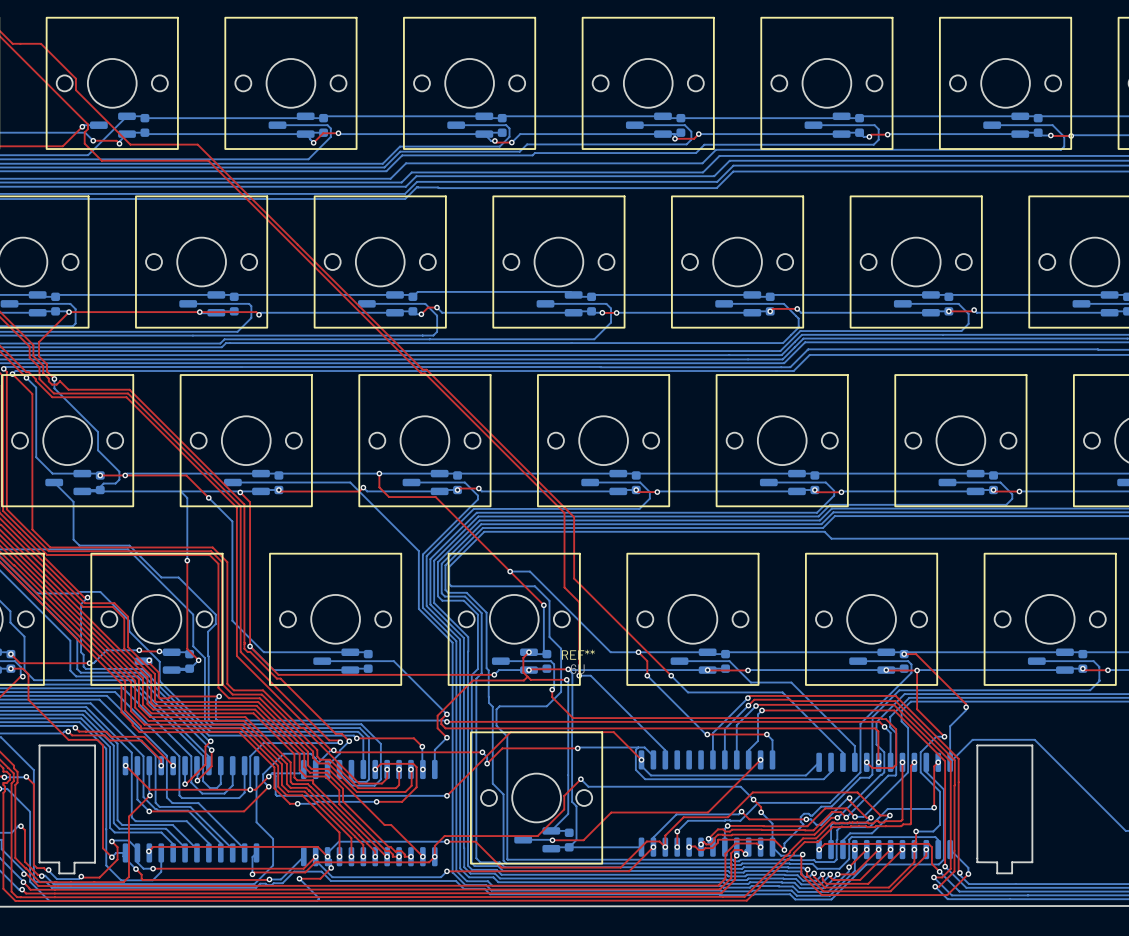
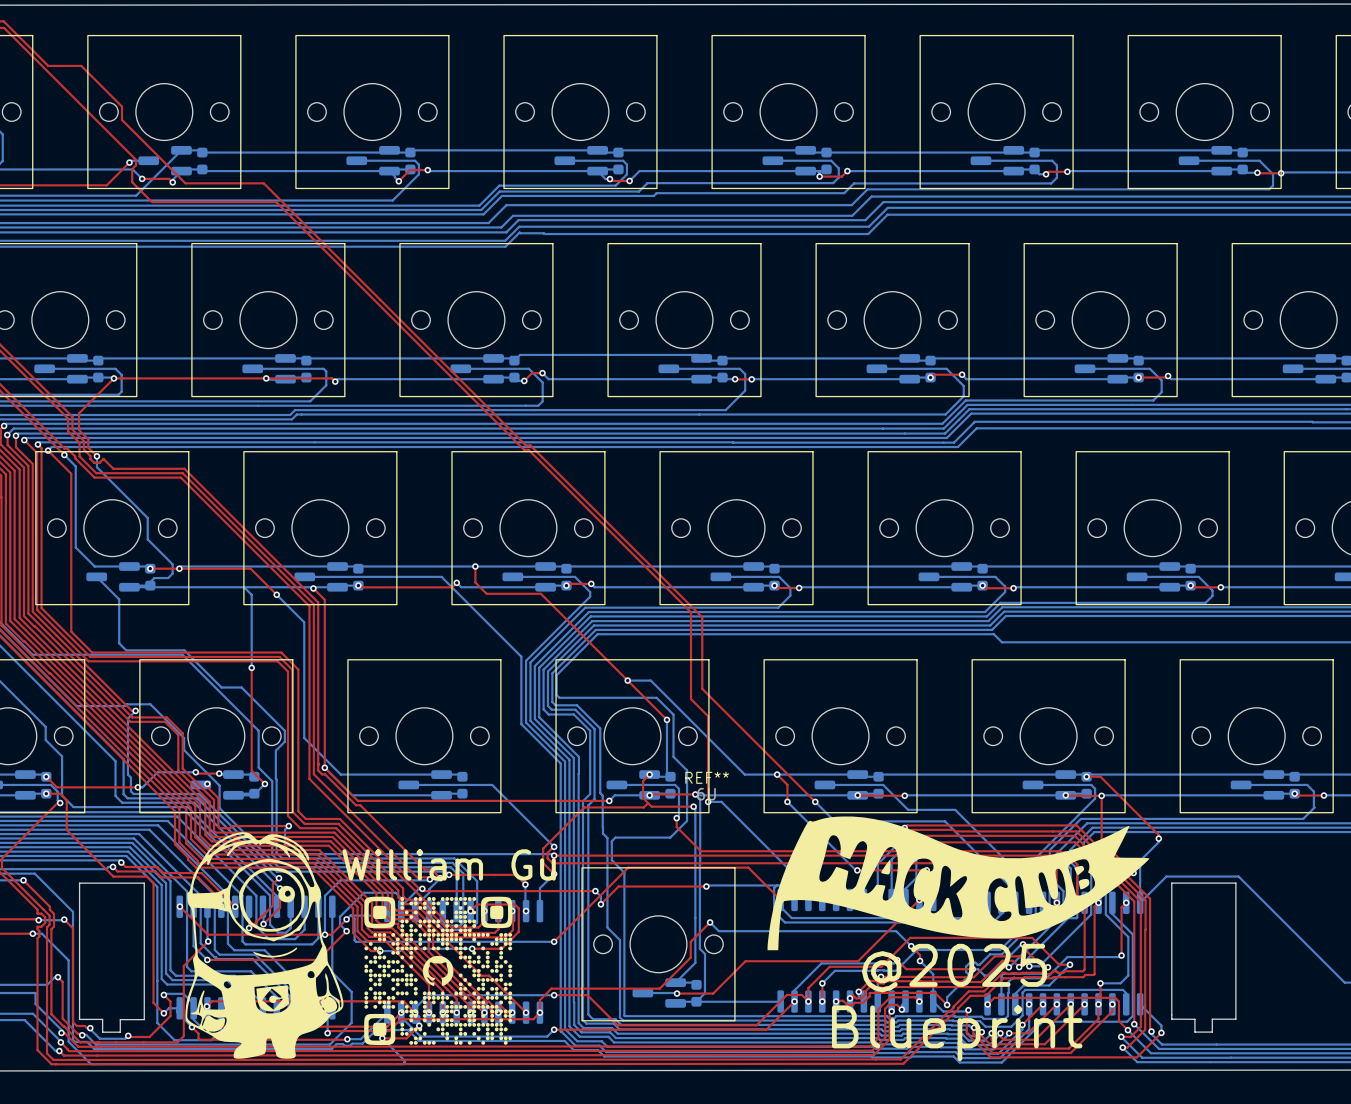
drawing: none -> [767, 816, 1150, 951]
drawing: none -> [185, 832, 344, 1059]
text: none -> William Gu (449, 864)
drawing: none -> [364, 896, 513, 1046]
text: none -> @2025 (954, 968)
text: none -> Blueprint (957, 1033)

